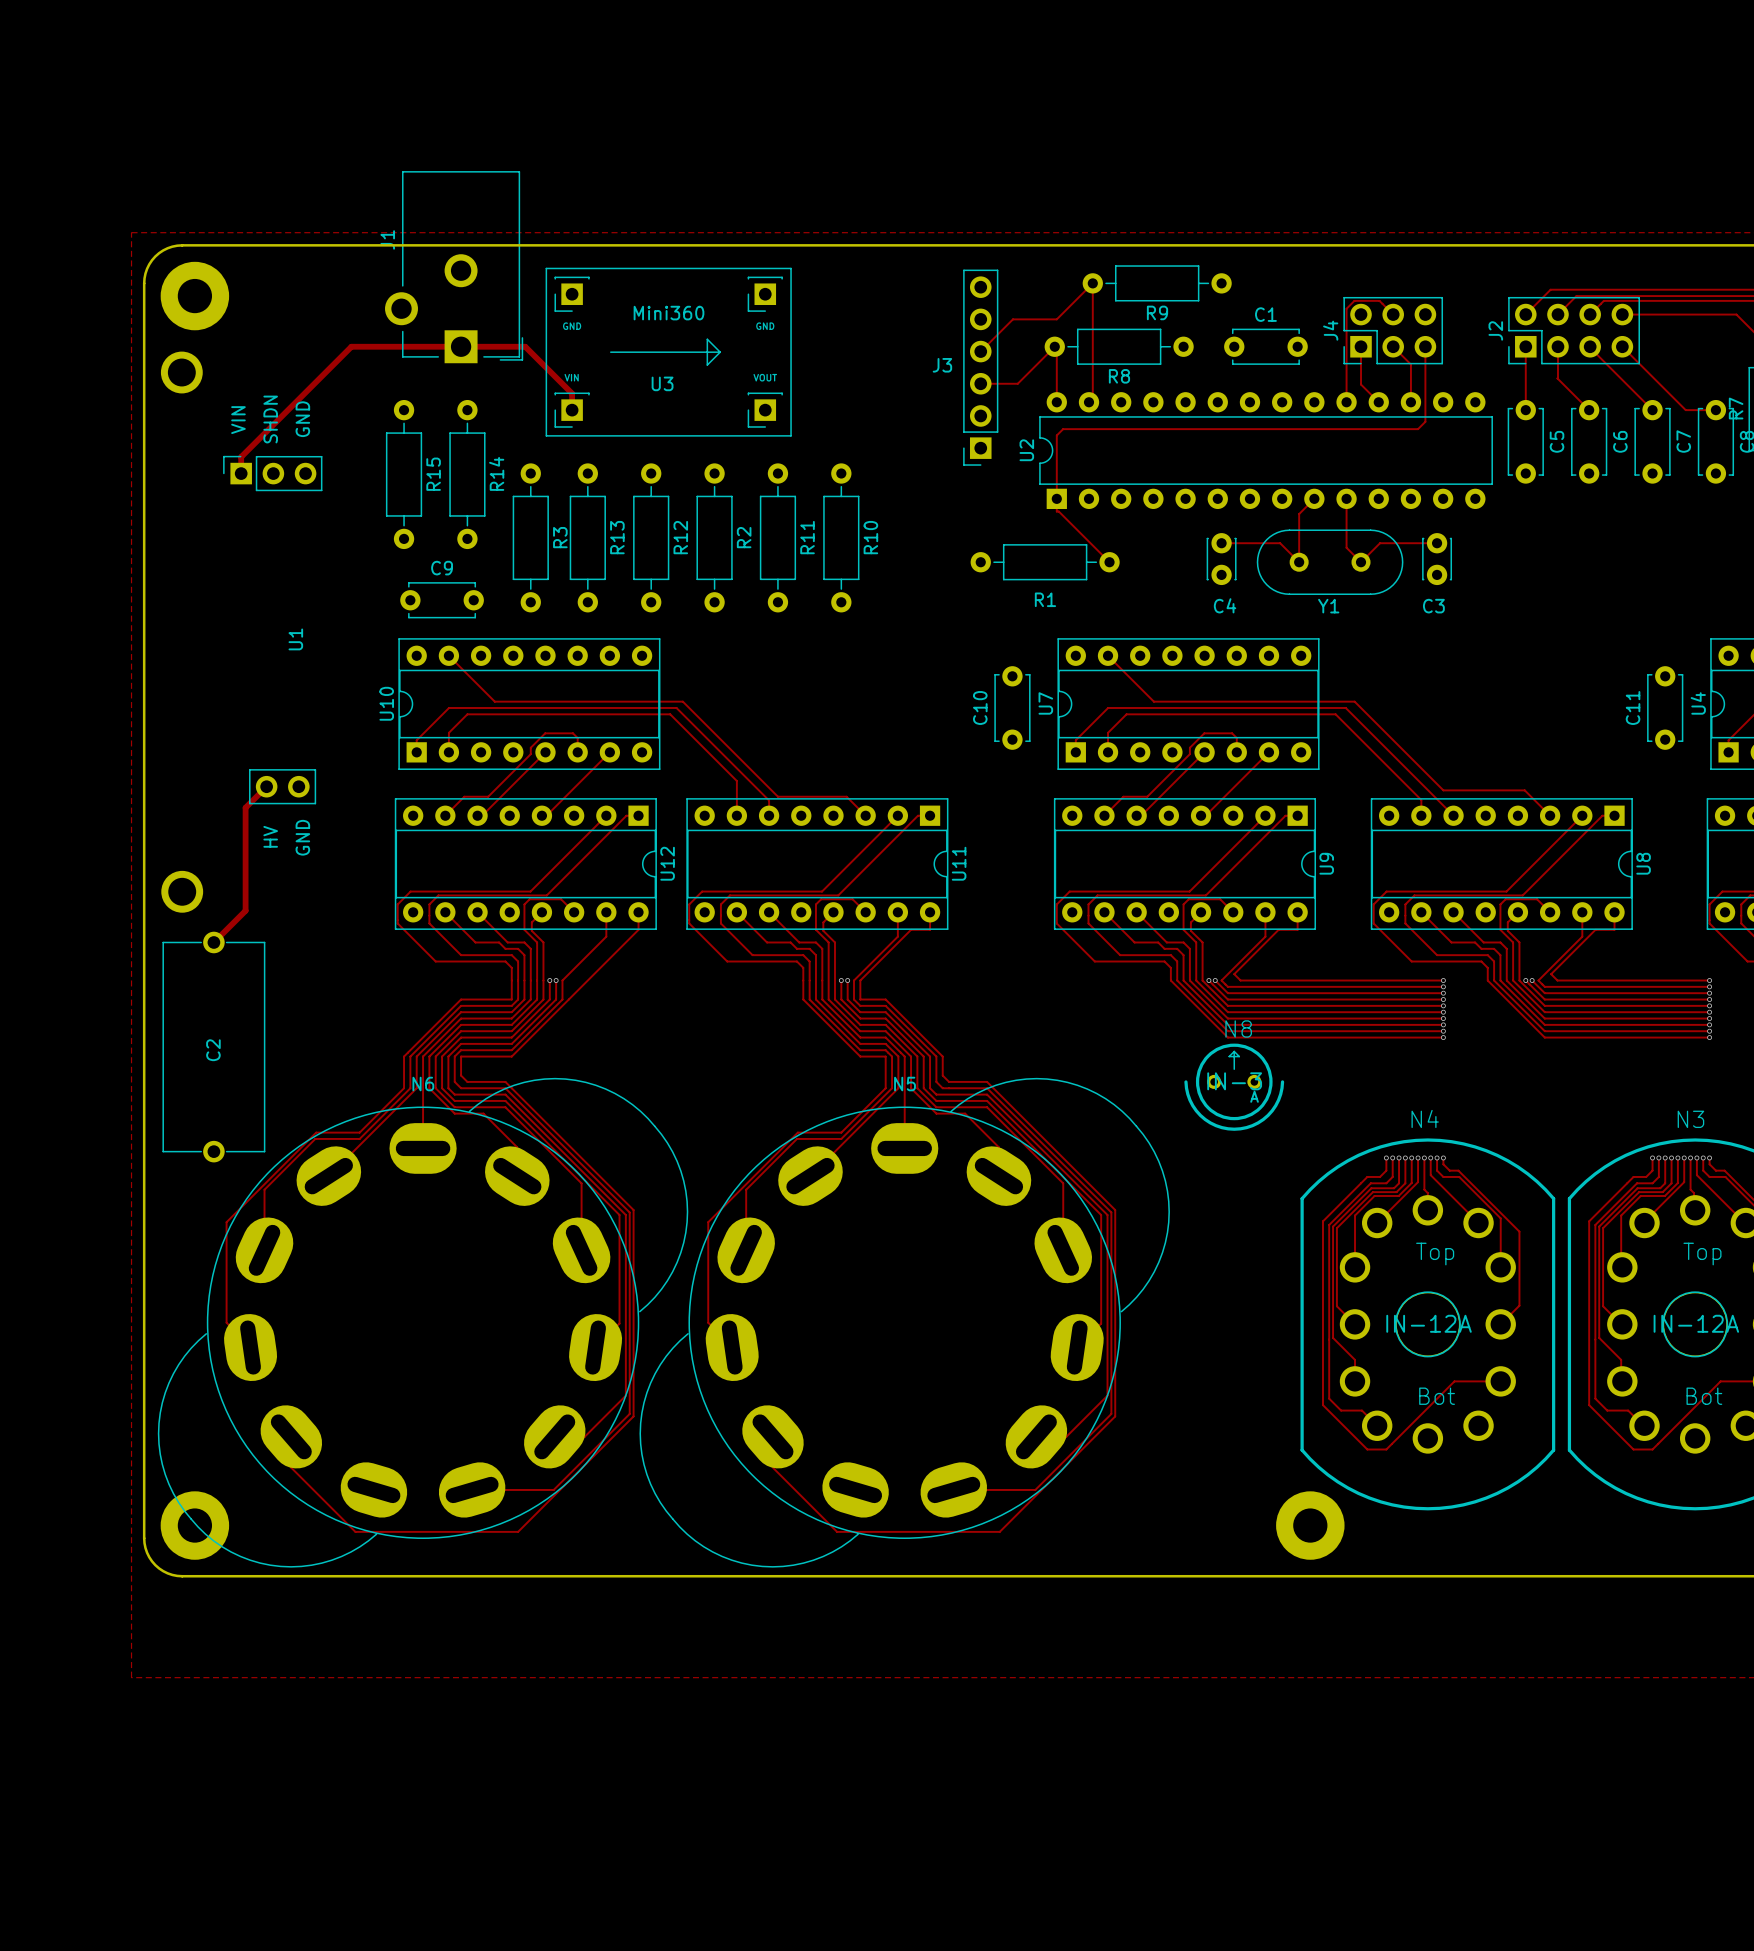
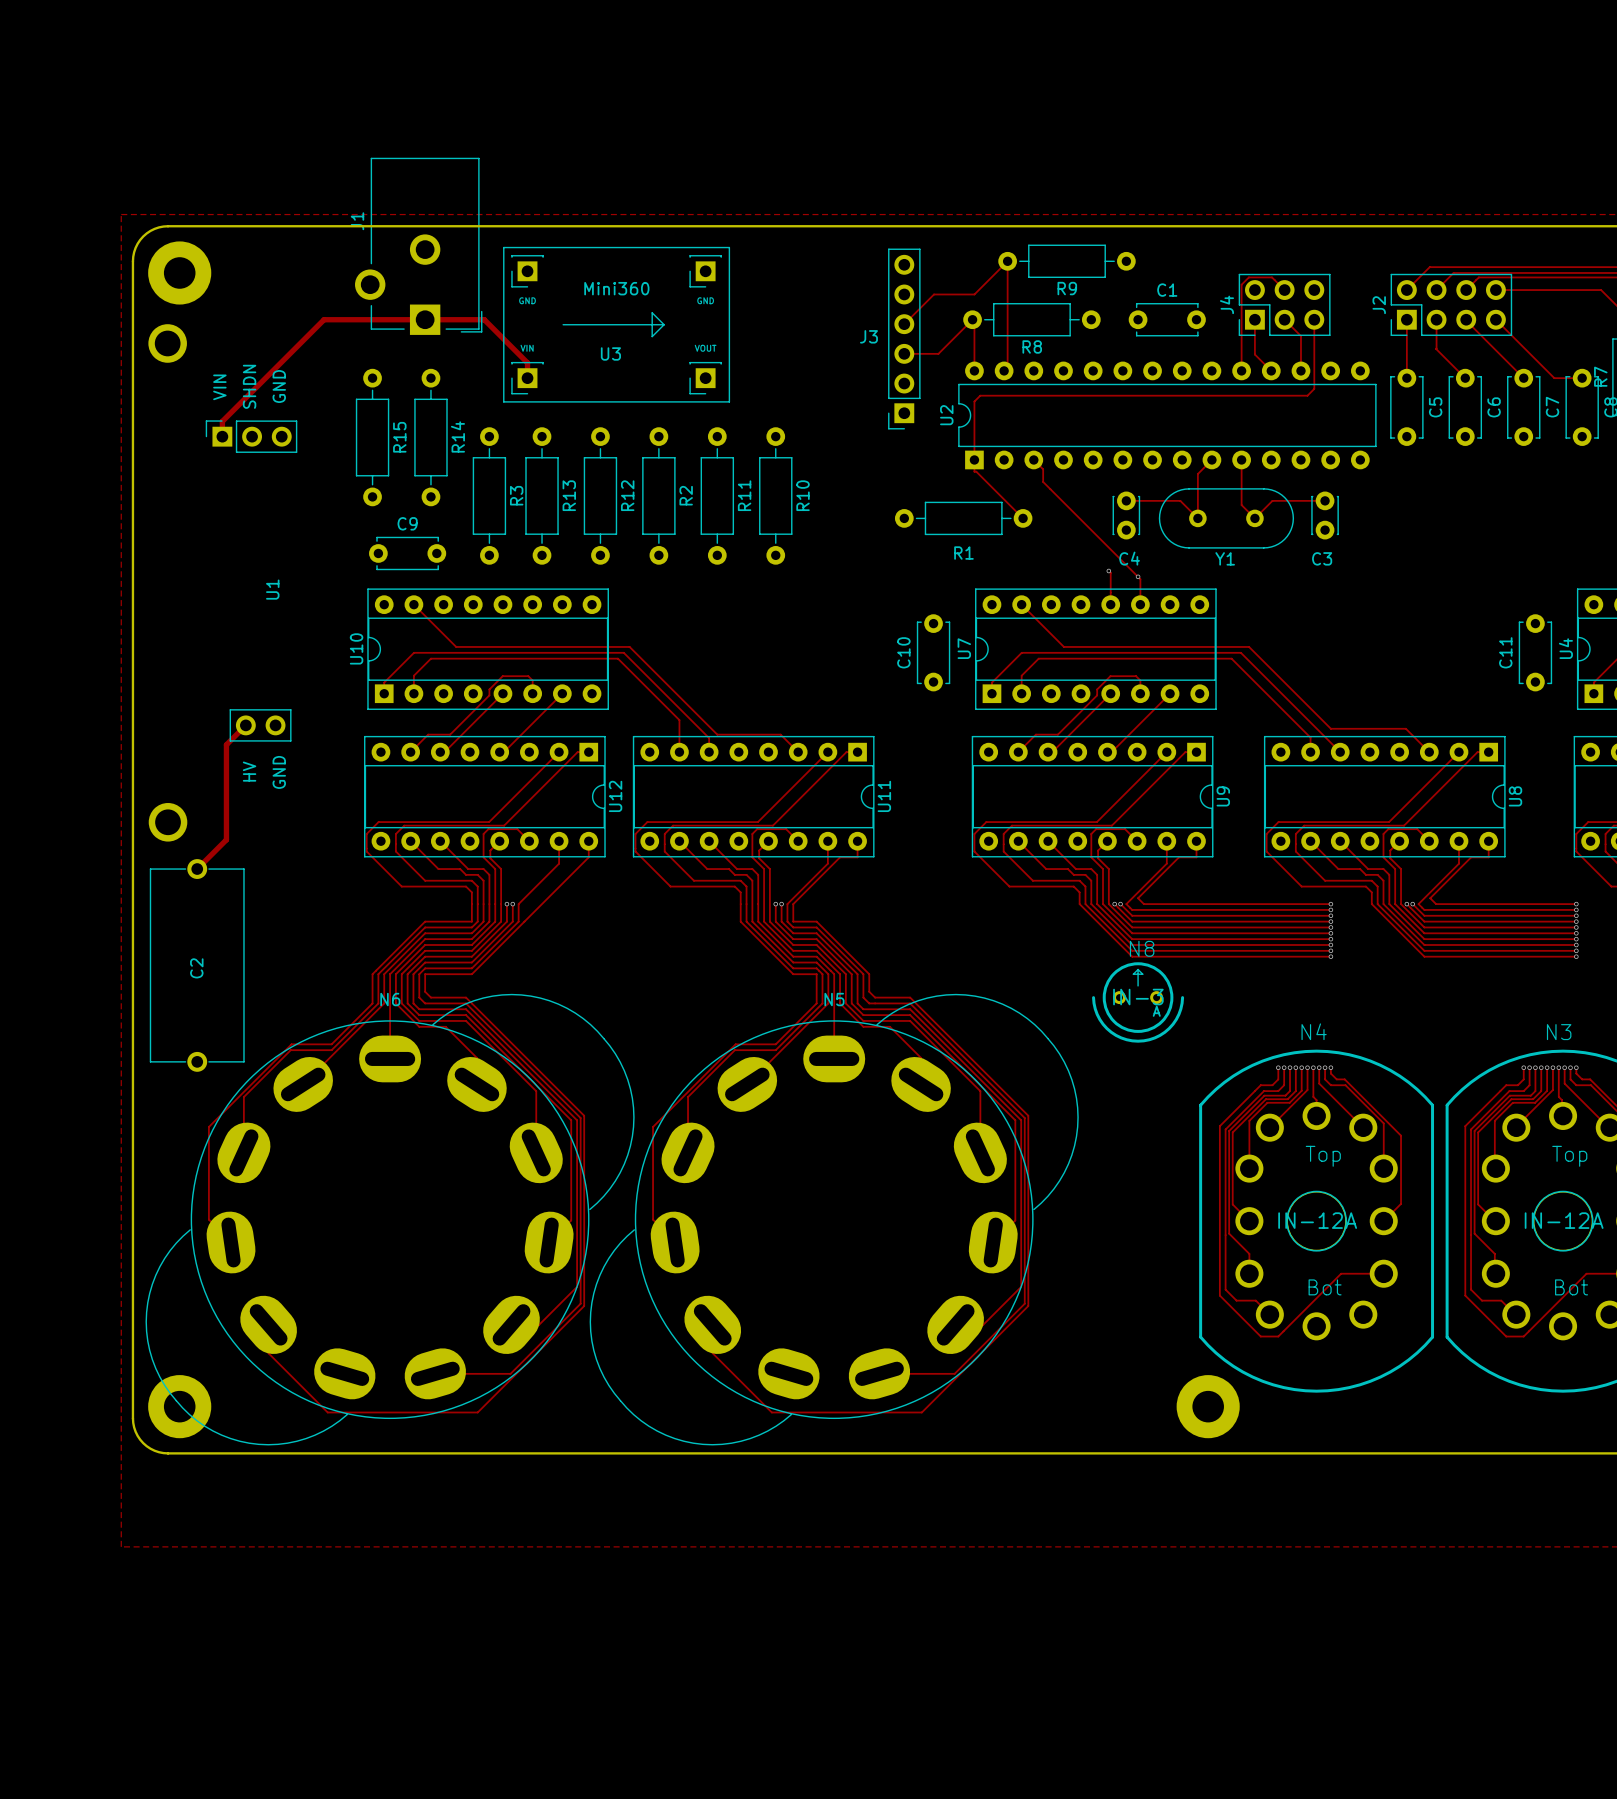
track: none -> (1033, 459) (1043, 469) (1043, 481) (1140, 579) (1140, 604)
track: none -> (1108, 571) (1110, 572) (1110, 604)
via: none -> (1108, 571)
via: none -> (1138, 576)

